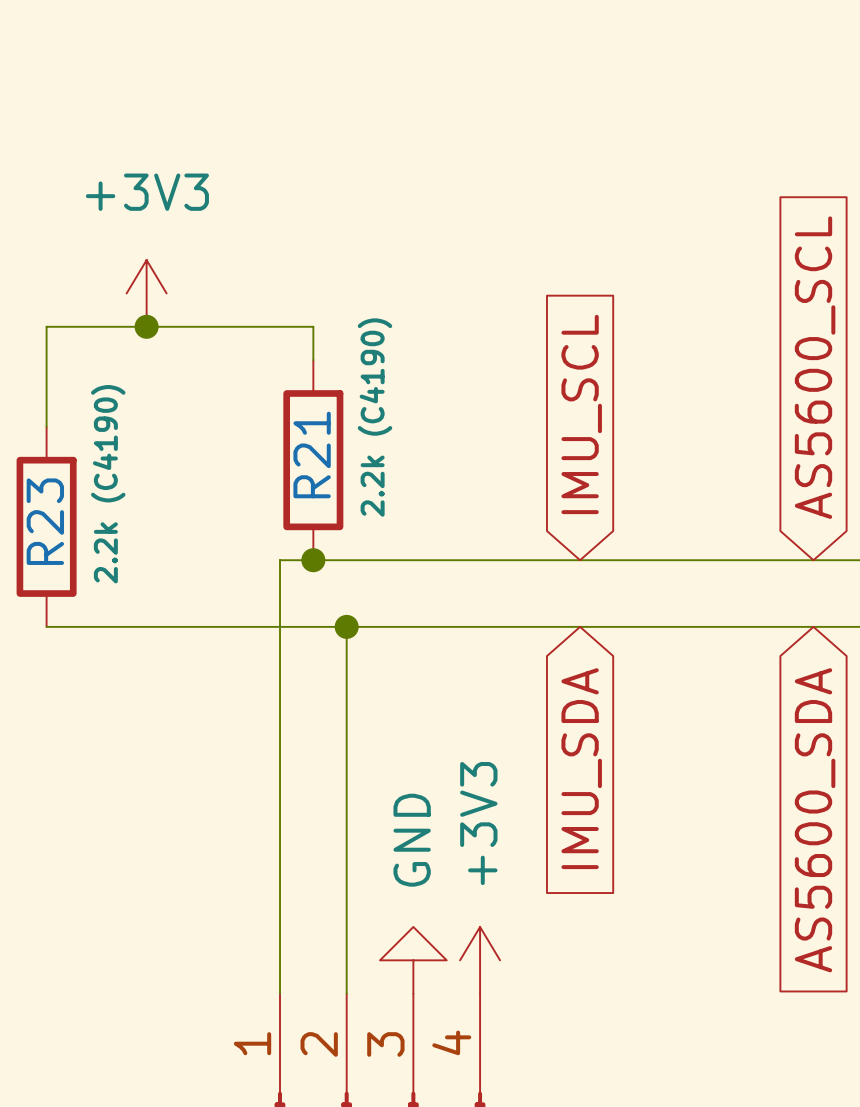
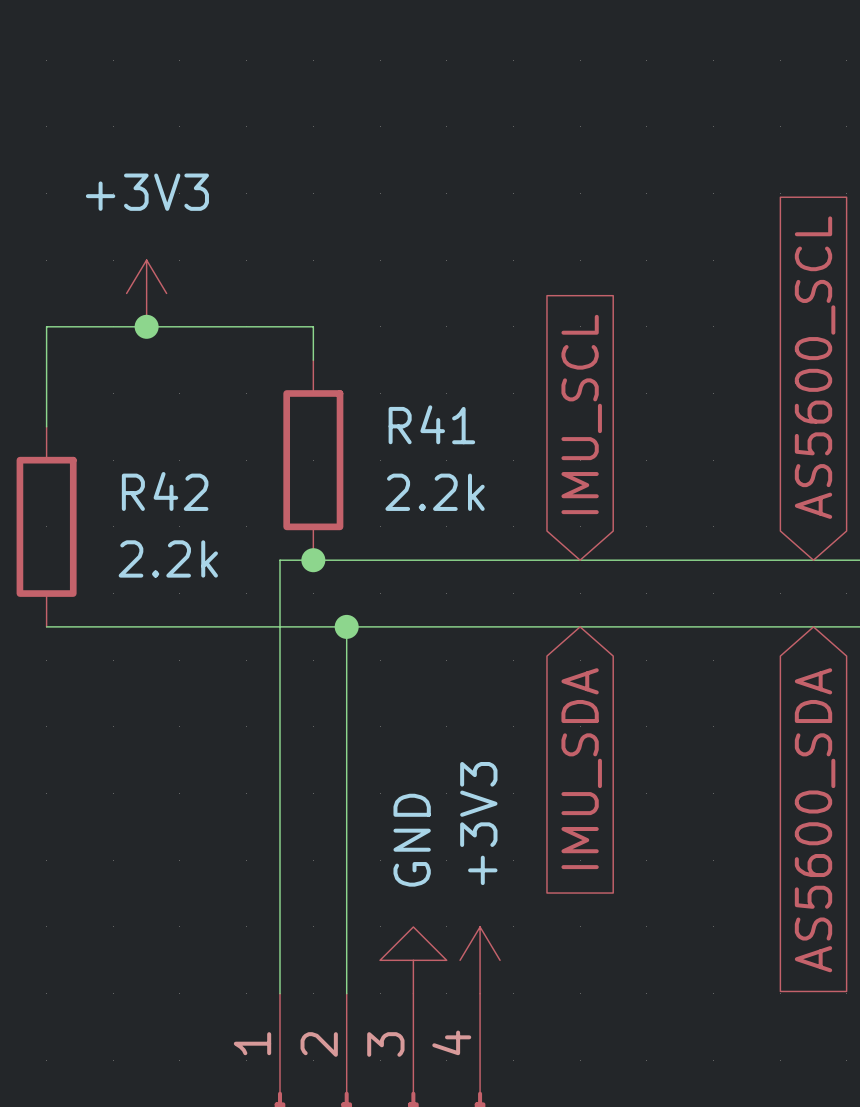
R21 value: 2.2k (C4190) (375, 417) -> 2.2k (435, 492)
R21 name: R21 (312, 455) -> R41 (431, 424)
R23 value: 2.2k (C4190) (108, 484) -> 2.2k (168, 558)
R23 name: R23 (45, 521) -> R42 (165, 491)

